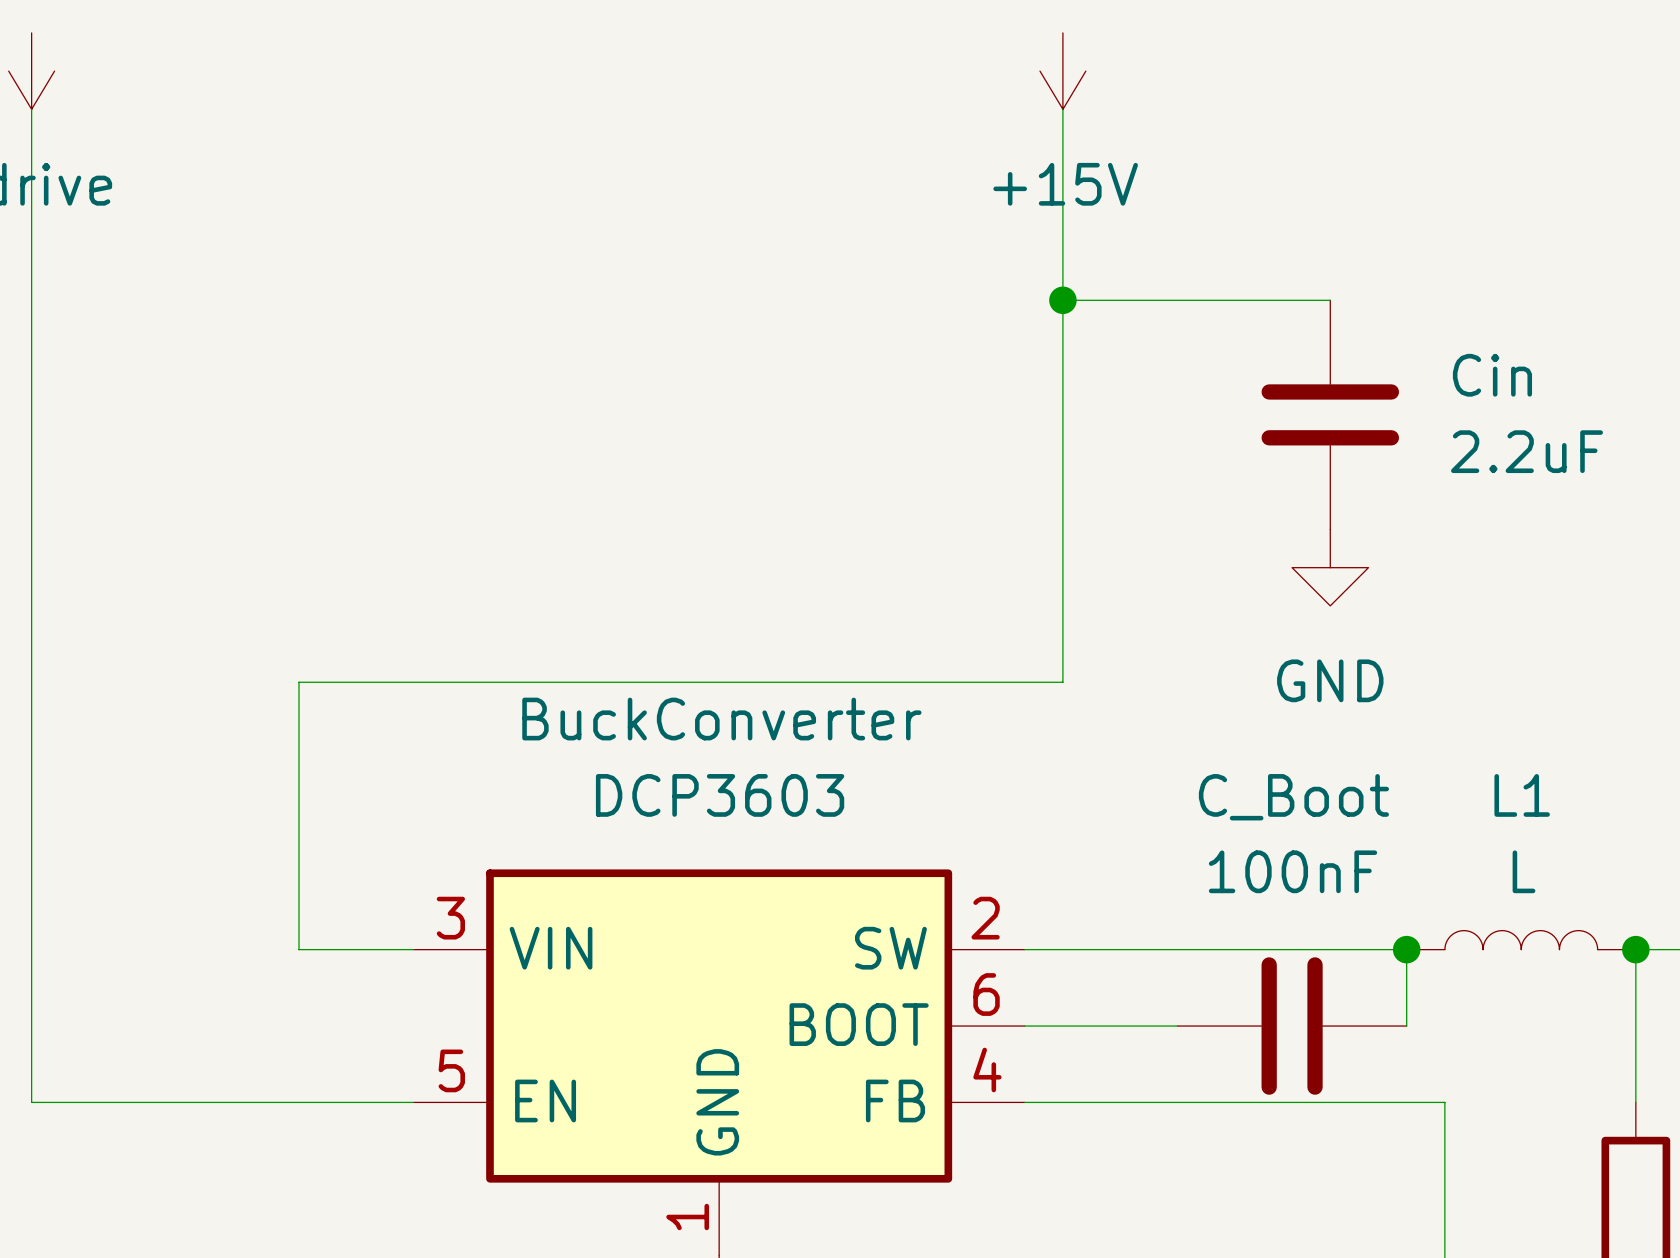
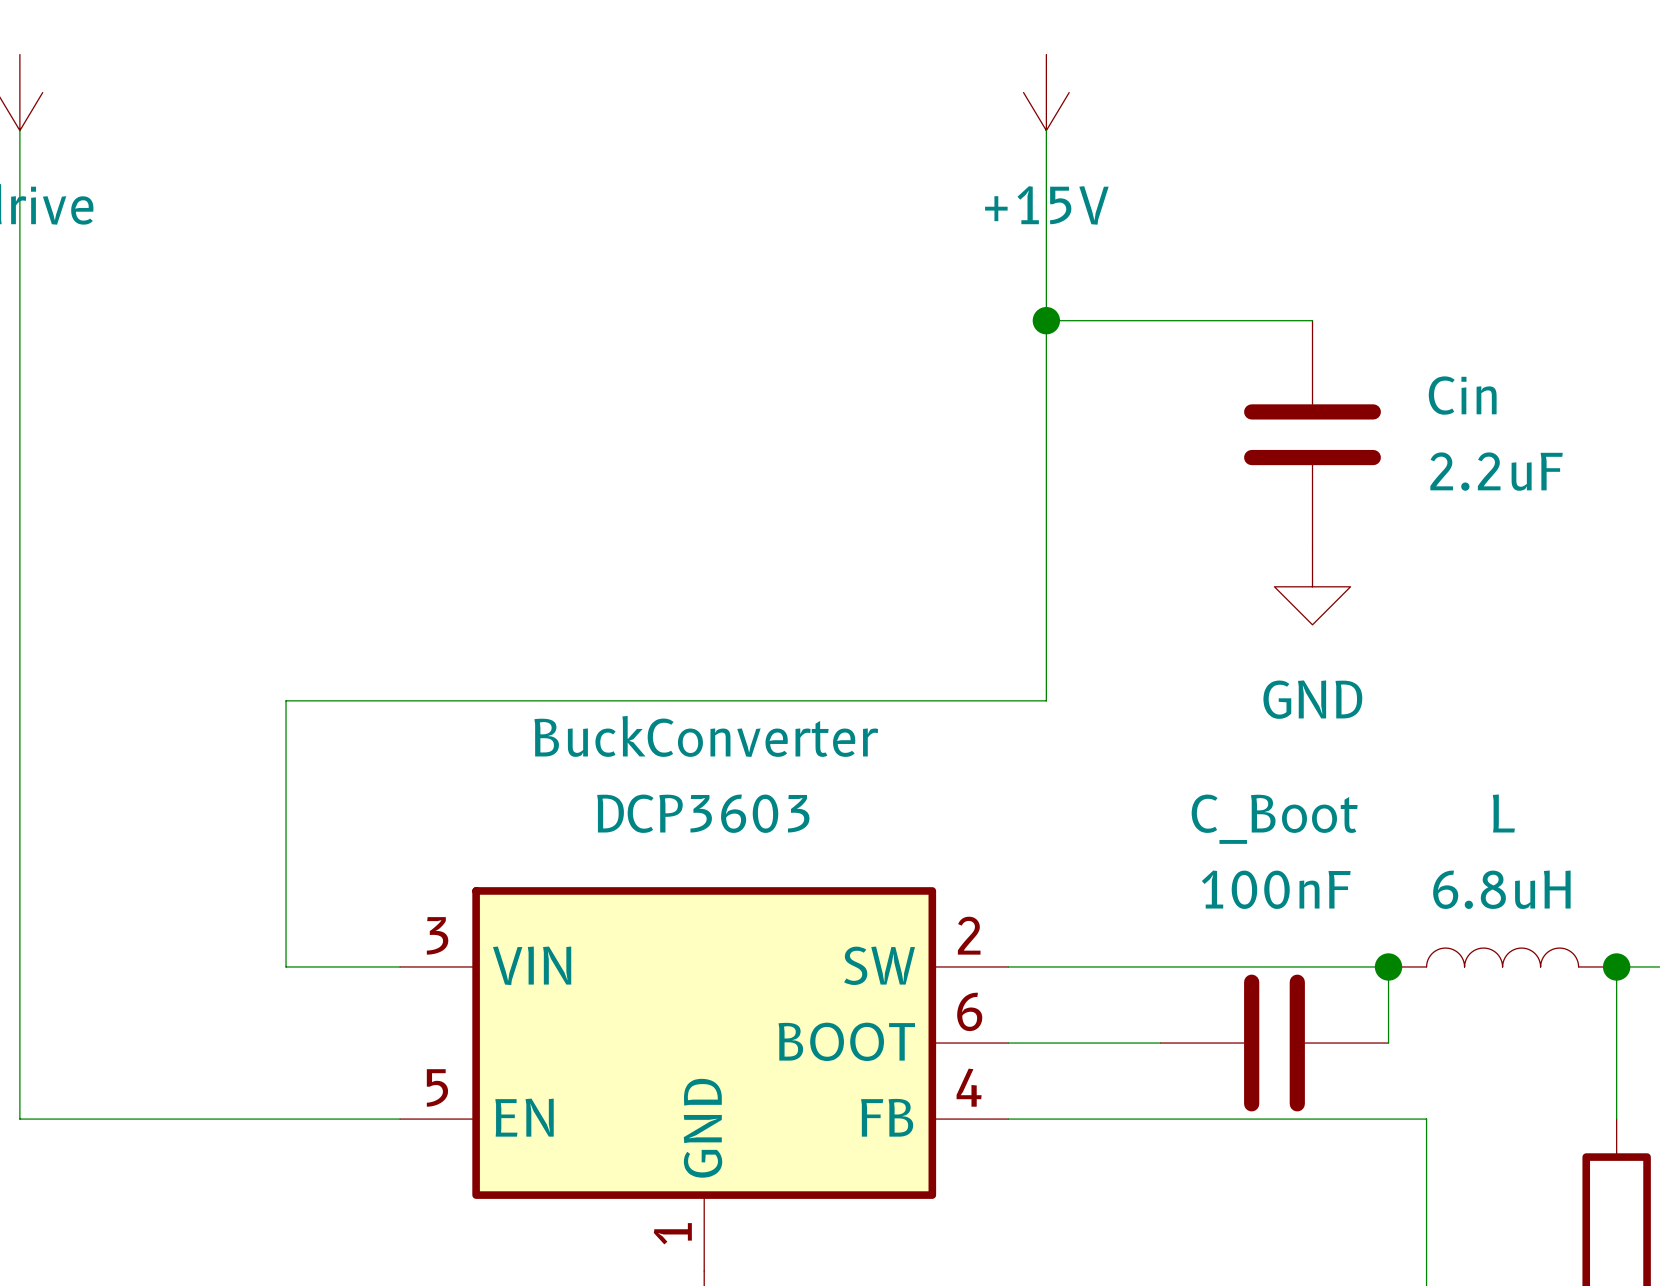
L1 name: L1 (1522, 795) -> L (1503, 813)
L1 value: L (1524, 871) -> 6.8uH (1501, 889)

